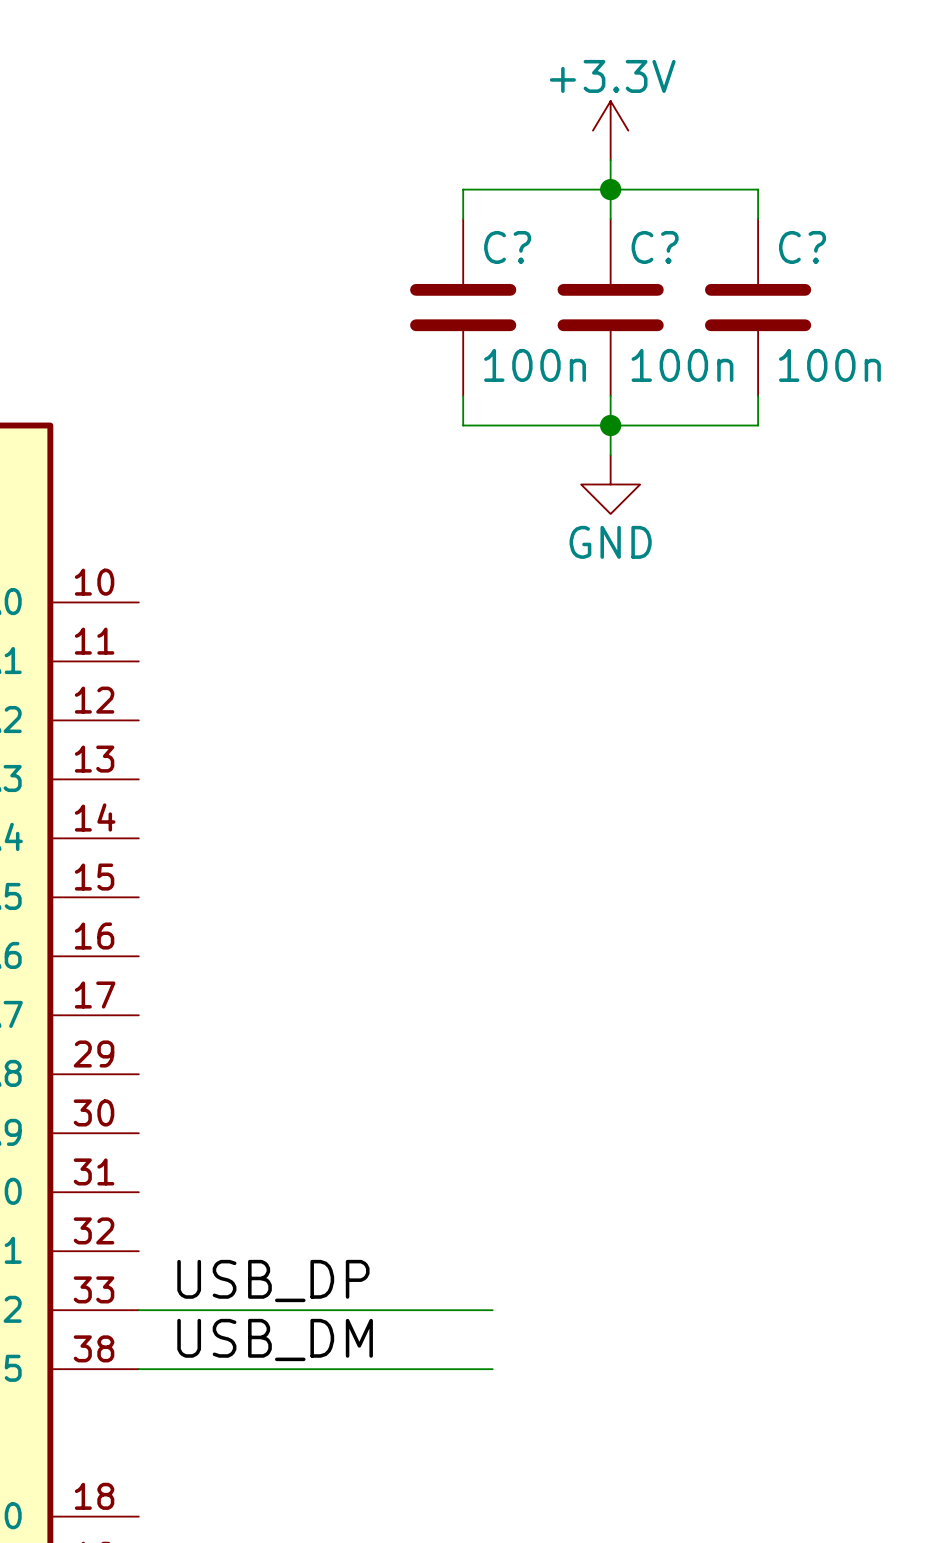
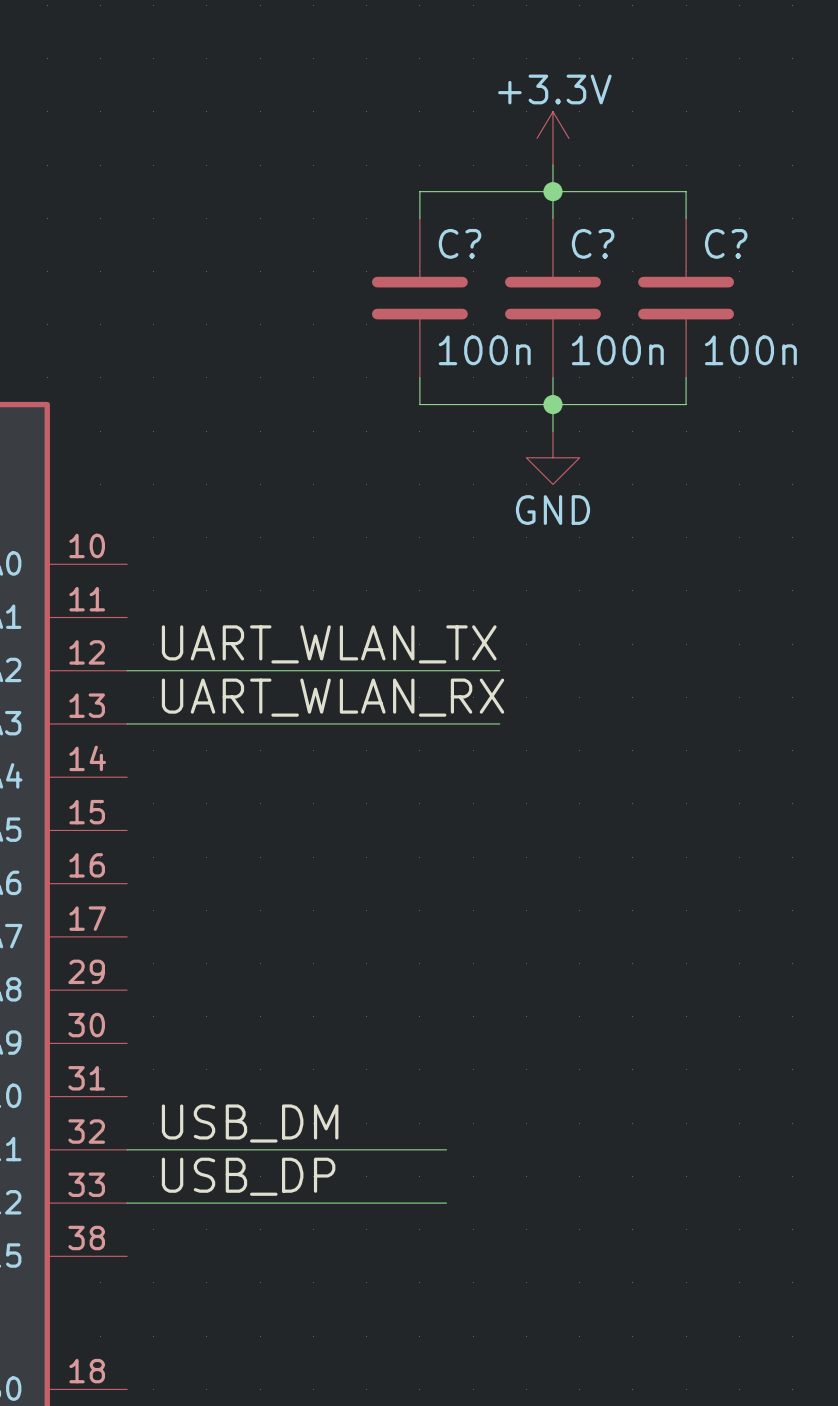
label: none -> UART_WLAN_TX (329, 644)
wire: none -> (127, 670) (499, 670)
label: none -> UART_WLAN_RX (333, 697)
wire: none -> (127, 723) (499, 723)
label position: USB_DM (275, 1339) -> USB_DM (250, 1123)
wire: (138, 1369) (492, 1369) -> (127, 1149) (446, 1149)

